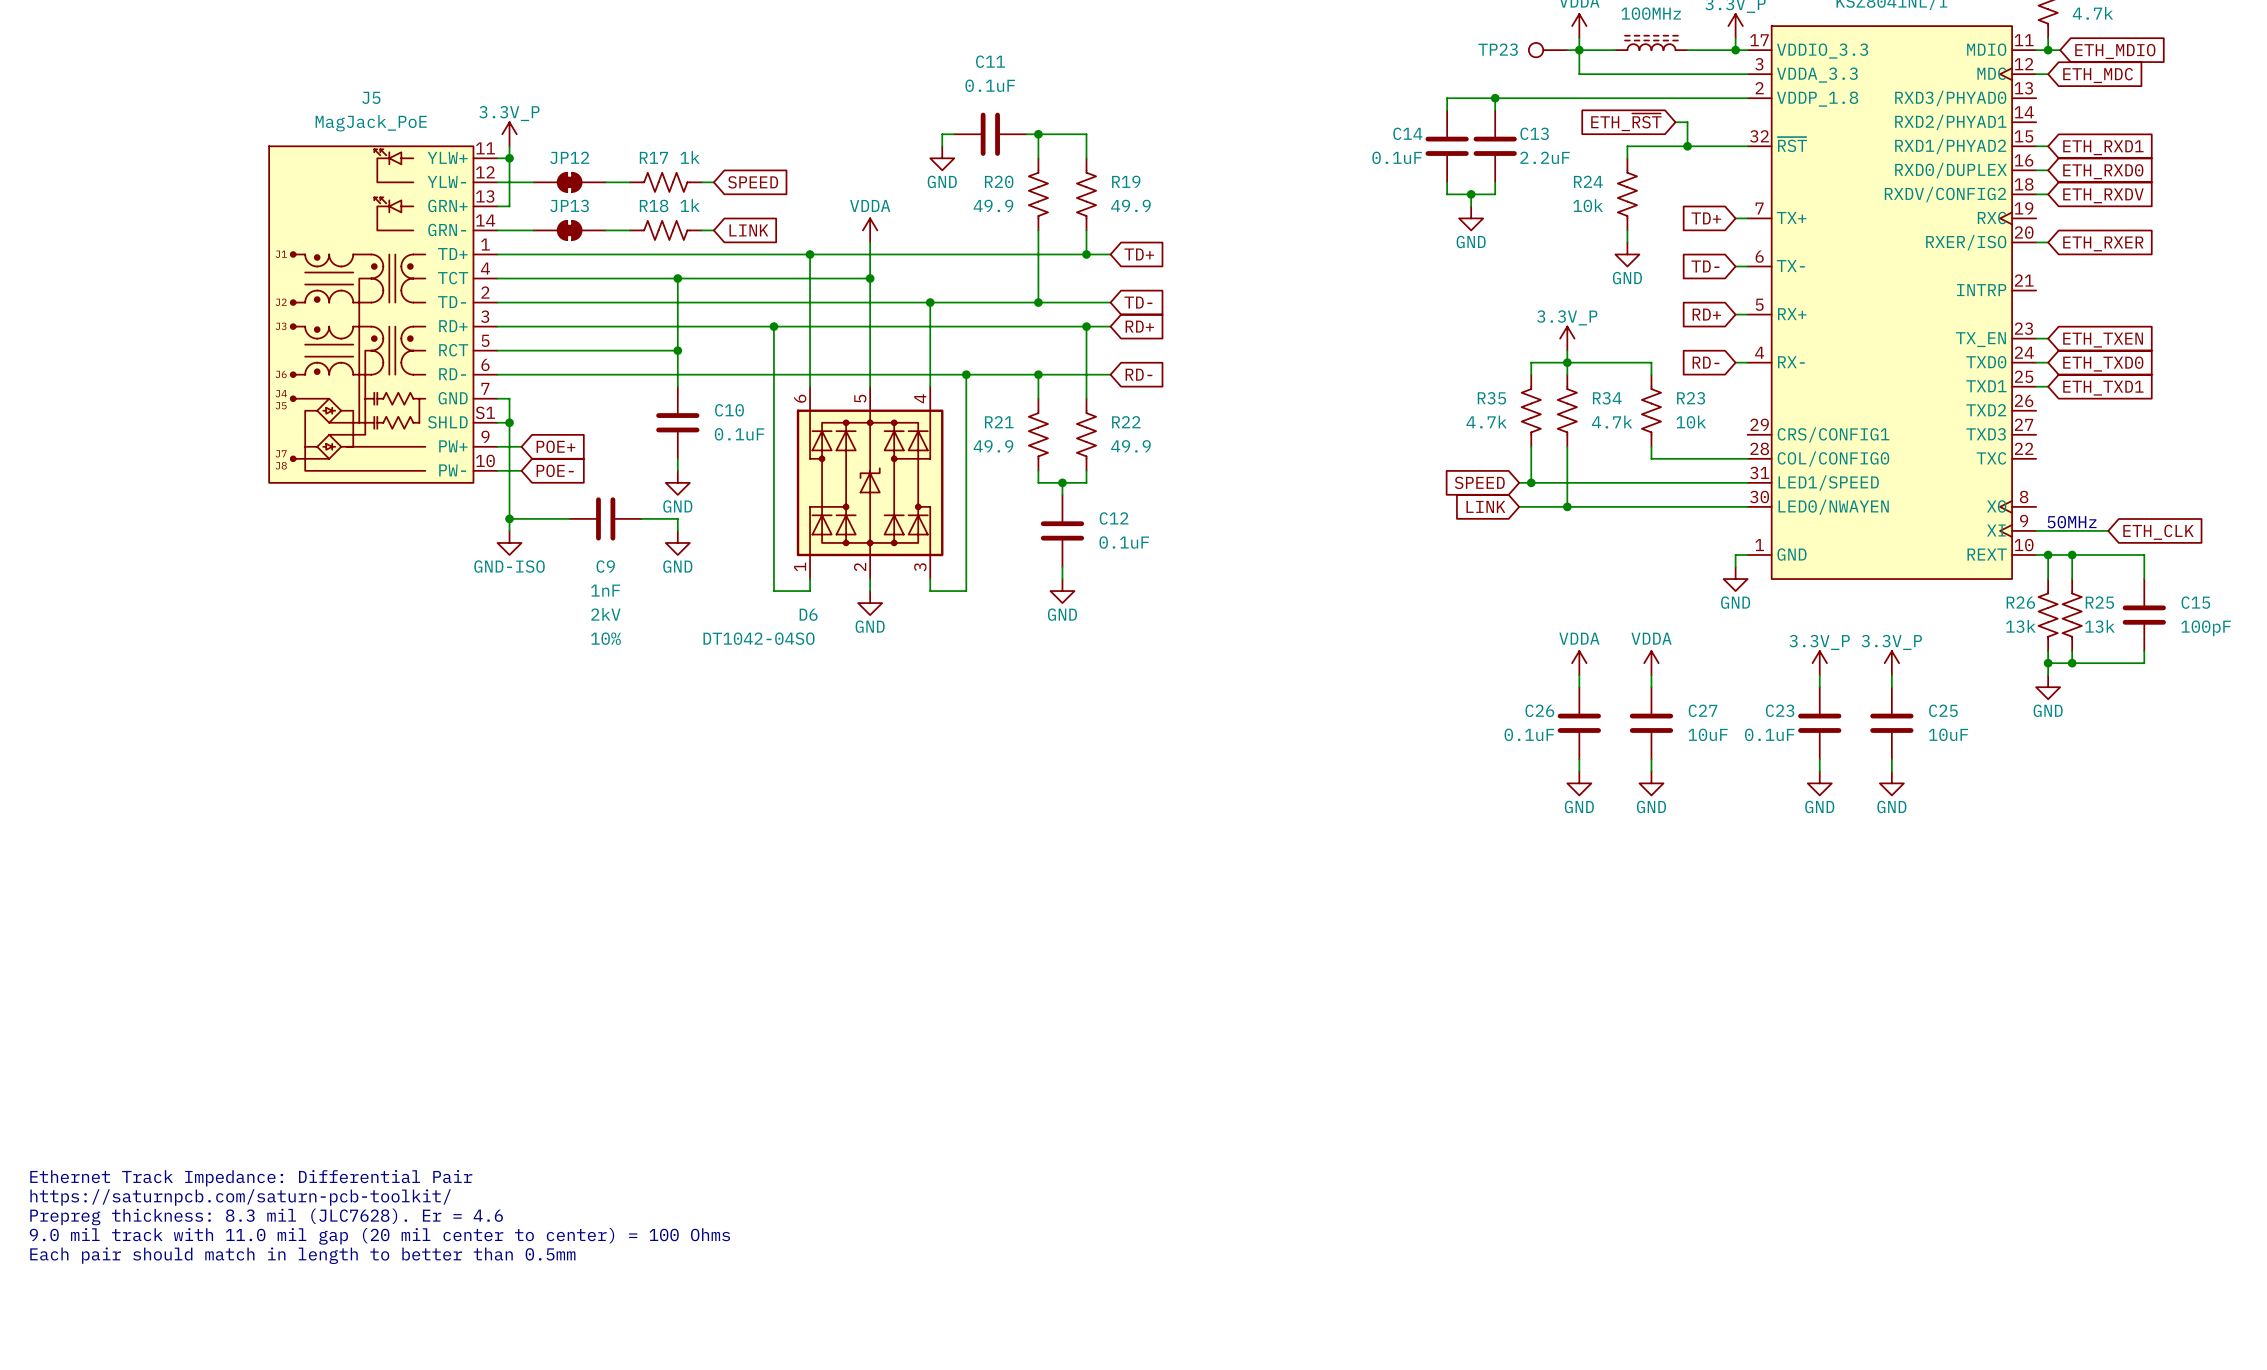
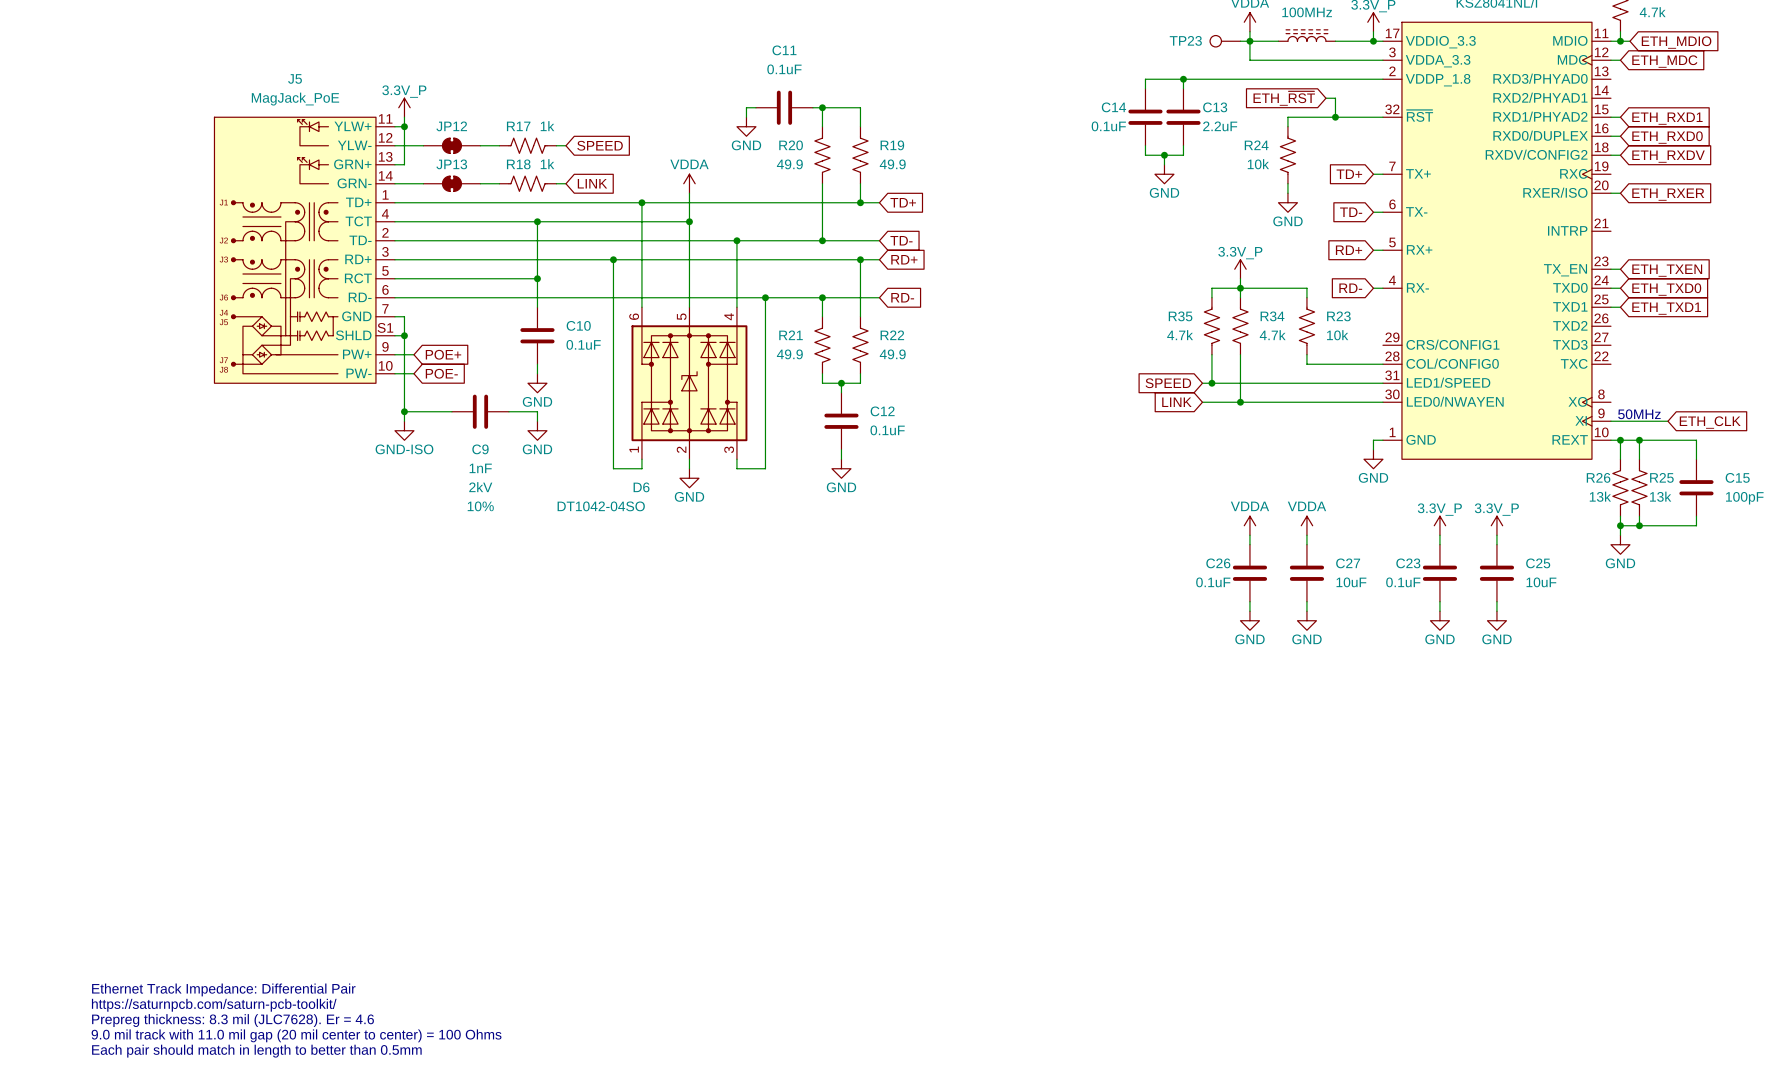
text position: Ethernet Track Impedance: Differential Pair (251, 1178) -> Ethernet Track Impedance: Differential Pair (223, 989)
text position: https://saturnpcb.com/saturn-pcb-toolkit/ (240, 1197) -> https://saturnpcb.com/saturn-pcb-toolkit/ (214, 1005)
text position: Prepreg thickness: 8.3 mil (JLC7628). Er = 4.6 (266, 1216) -> Prepreg thickness: 8.3 mil (JLC7628). Er = 4.6 (233, 1020)
text position: 9.0 mil track with 11.0 mil gap (20 mil center to center) = 100 Ohms (379, 1236) -> 9.0 mil track with 11.0 mil gap (20 mil center to center) = 100 Ohms (296, 1035)
text position: Each pair should match in length to better than 0.5mm (302, 1255) -> Each pair should match in length to better than 0.5mm (256, 1051)

